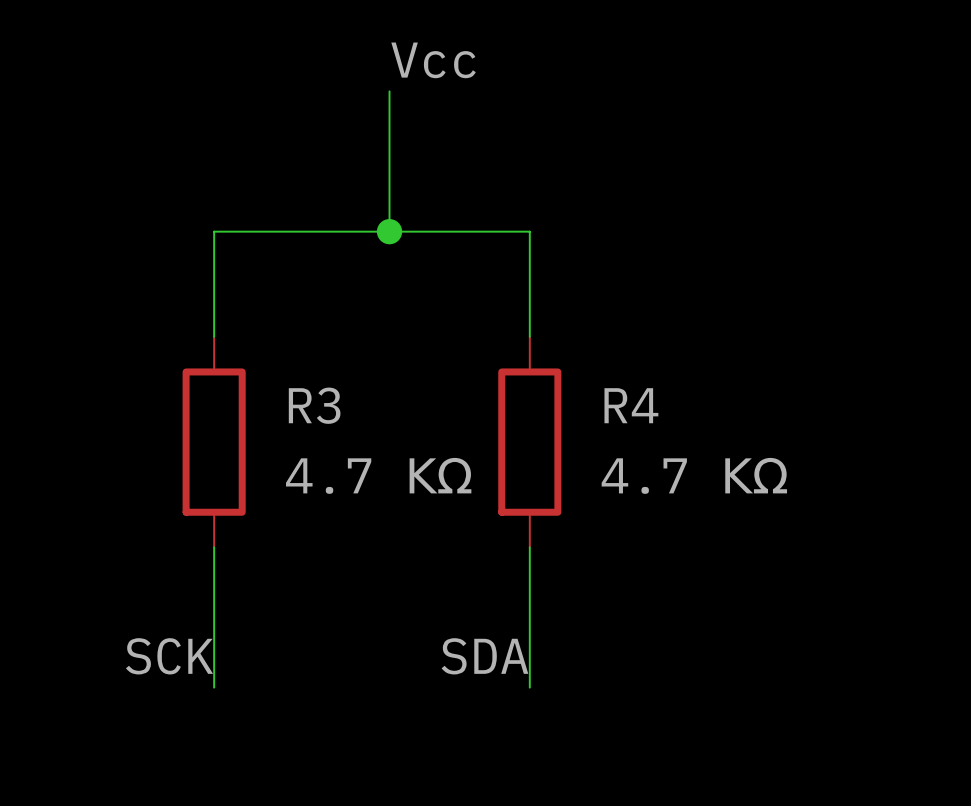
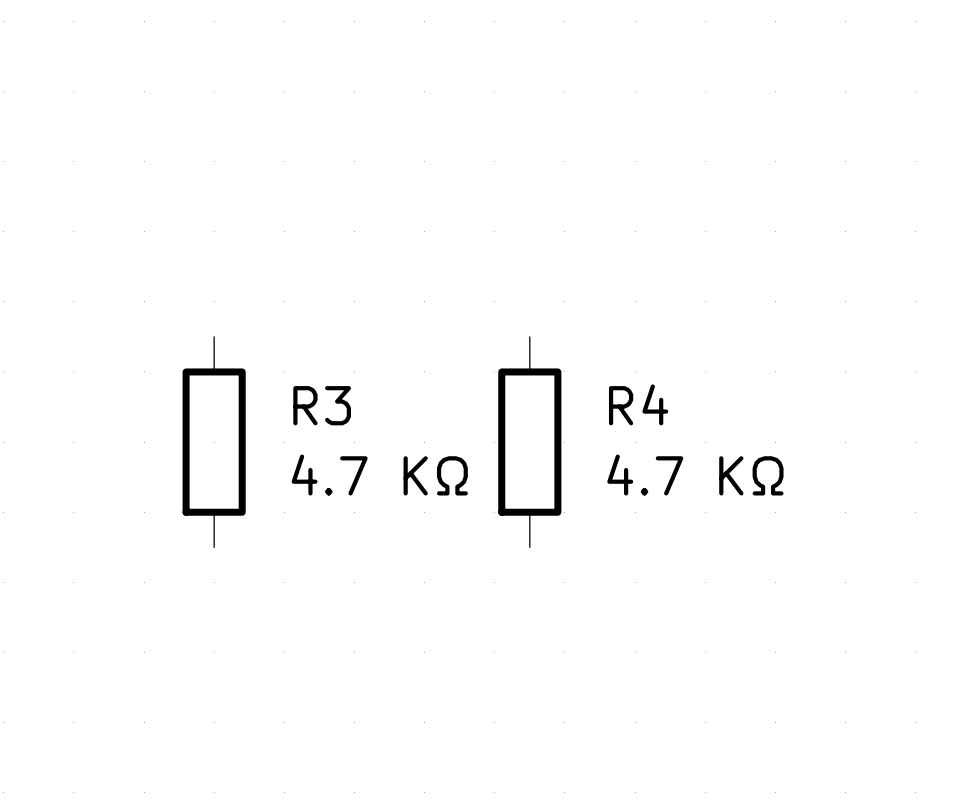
label: Vcc (433, 60) -> none
wire: (389, 91) (389, 231) -> none
junction: (389, 231) -> none
wire: (214, 336) (214, 231) (529, 231) (529, 336) -> none
wire: (214, 547) (214, 687) -> none
wire: (529, 547) (529, 687) -> none
label: SCK (169, 656) -> none
label: SDA (484, 656) -> none

